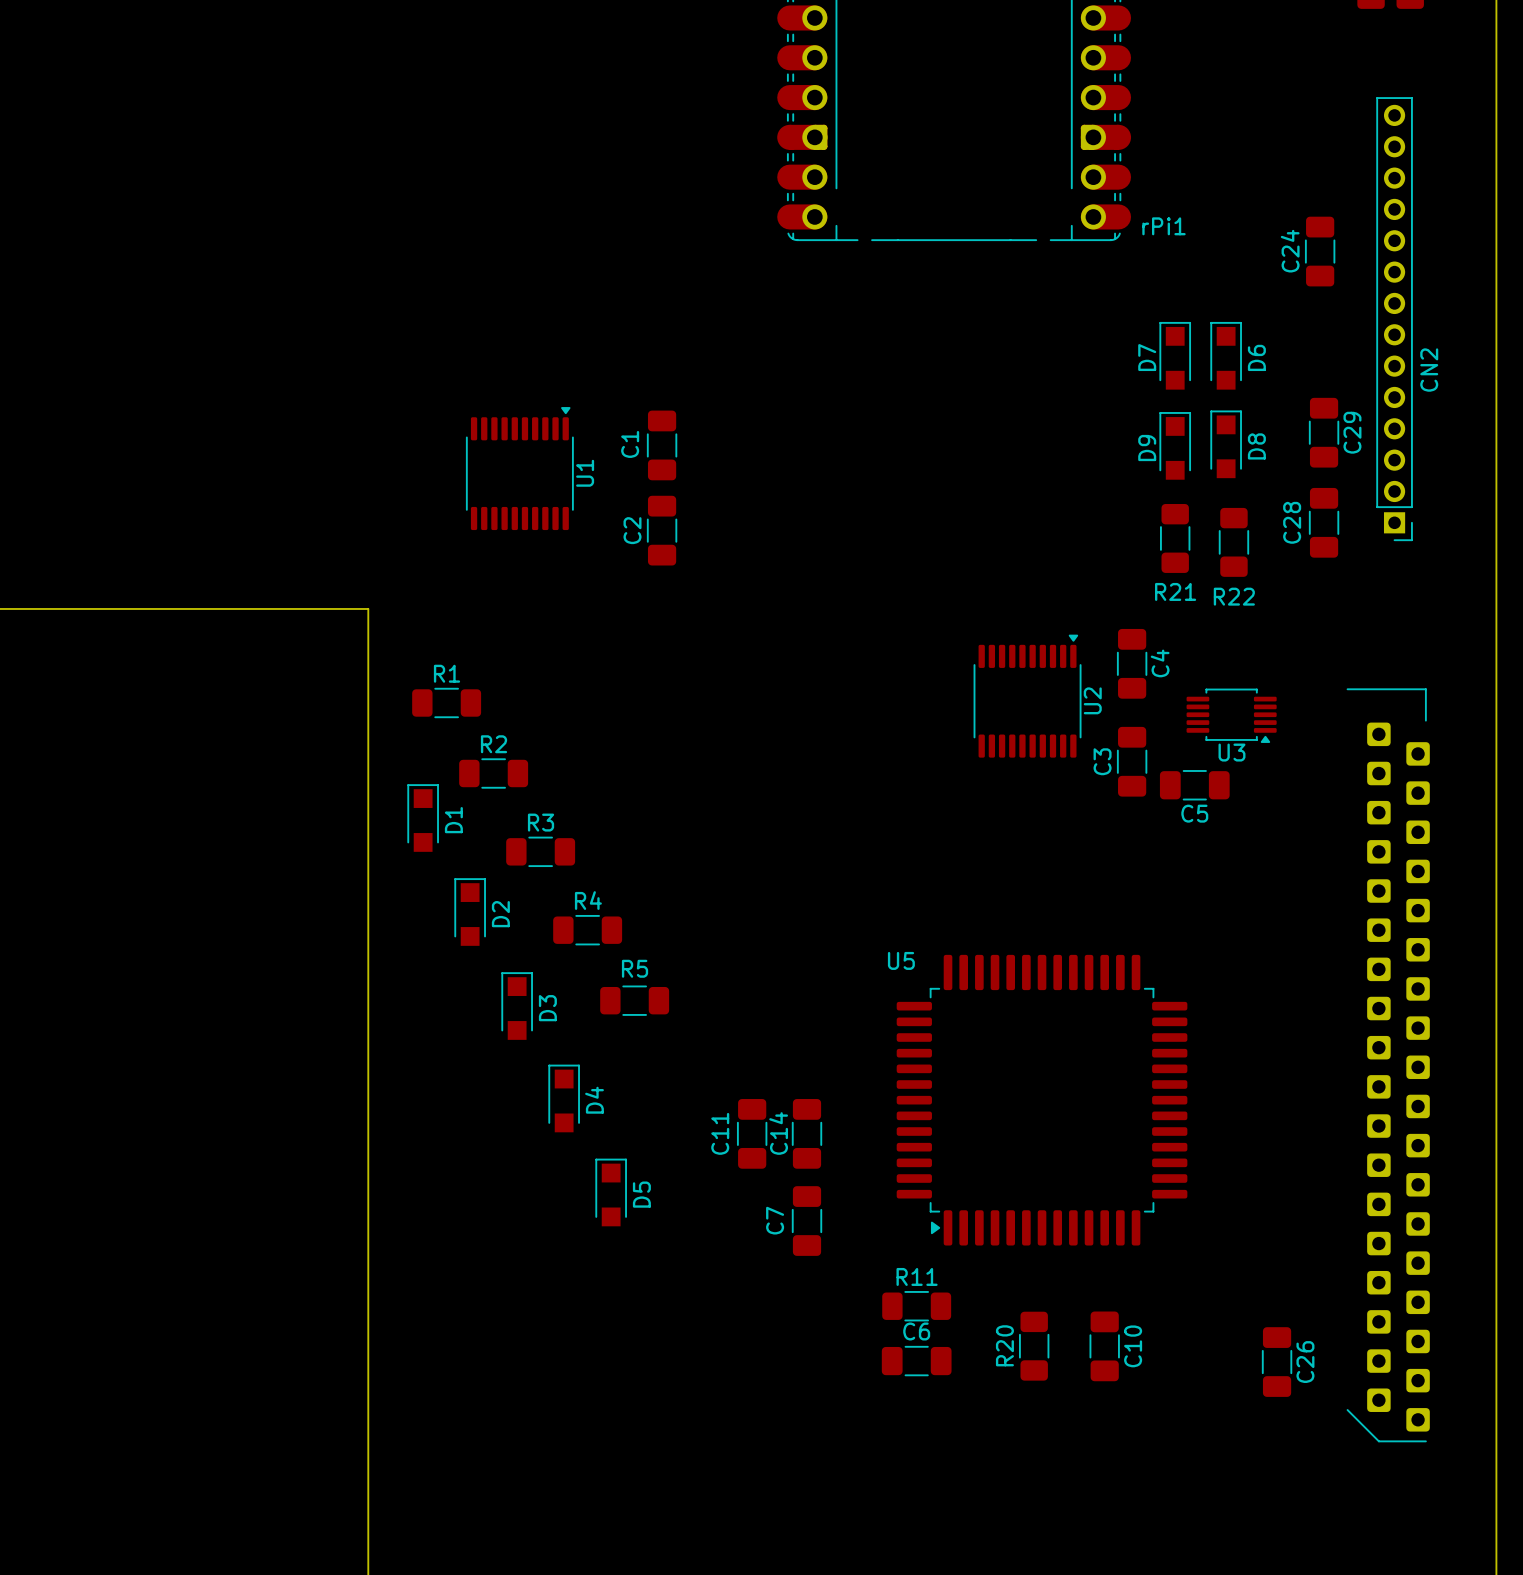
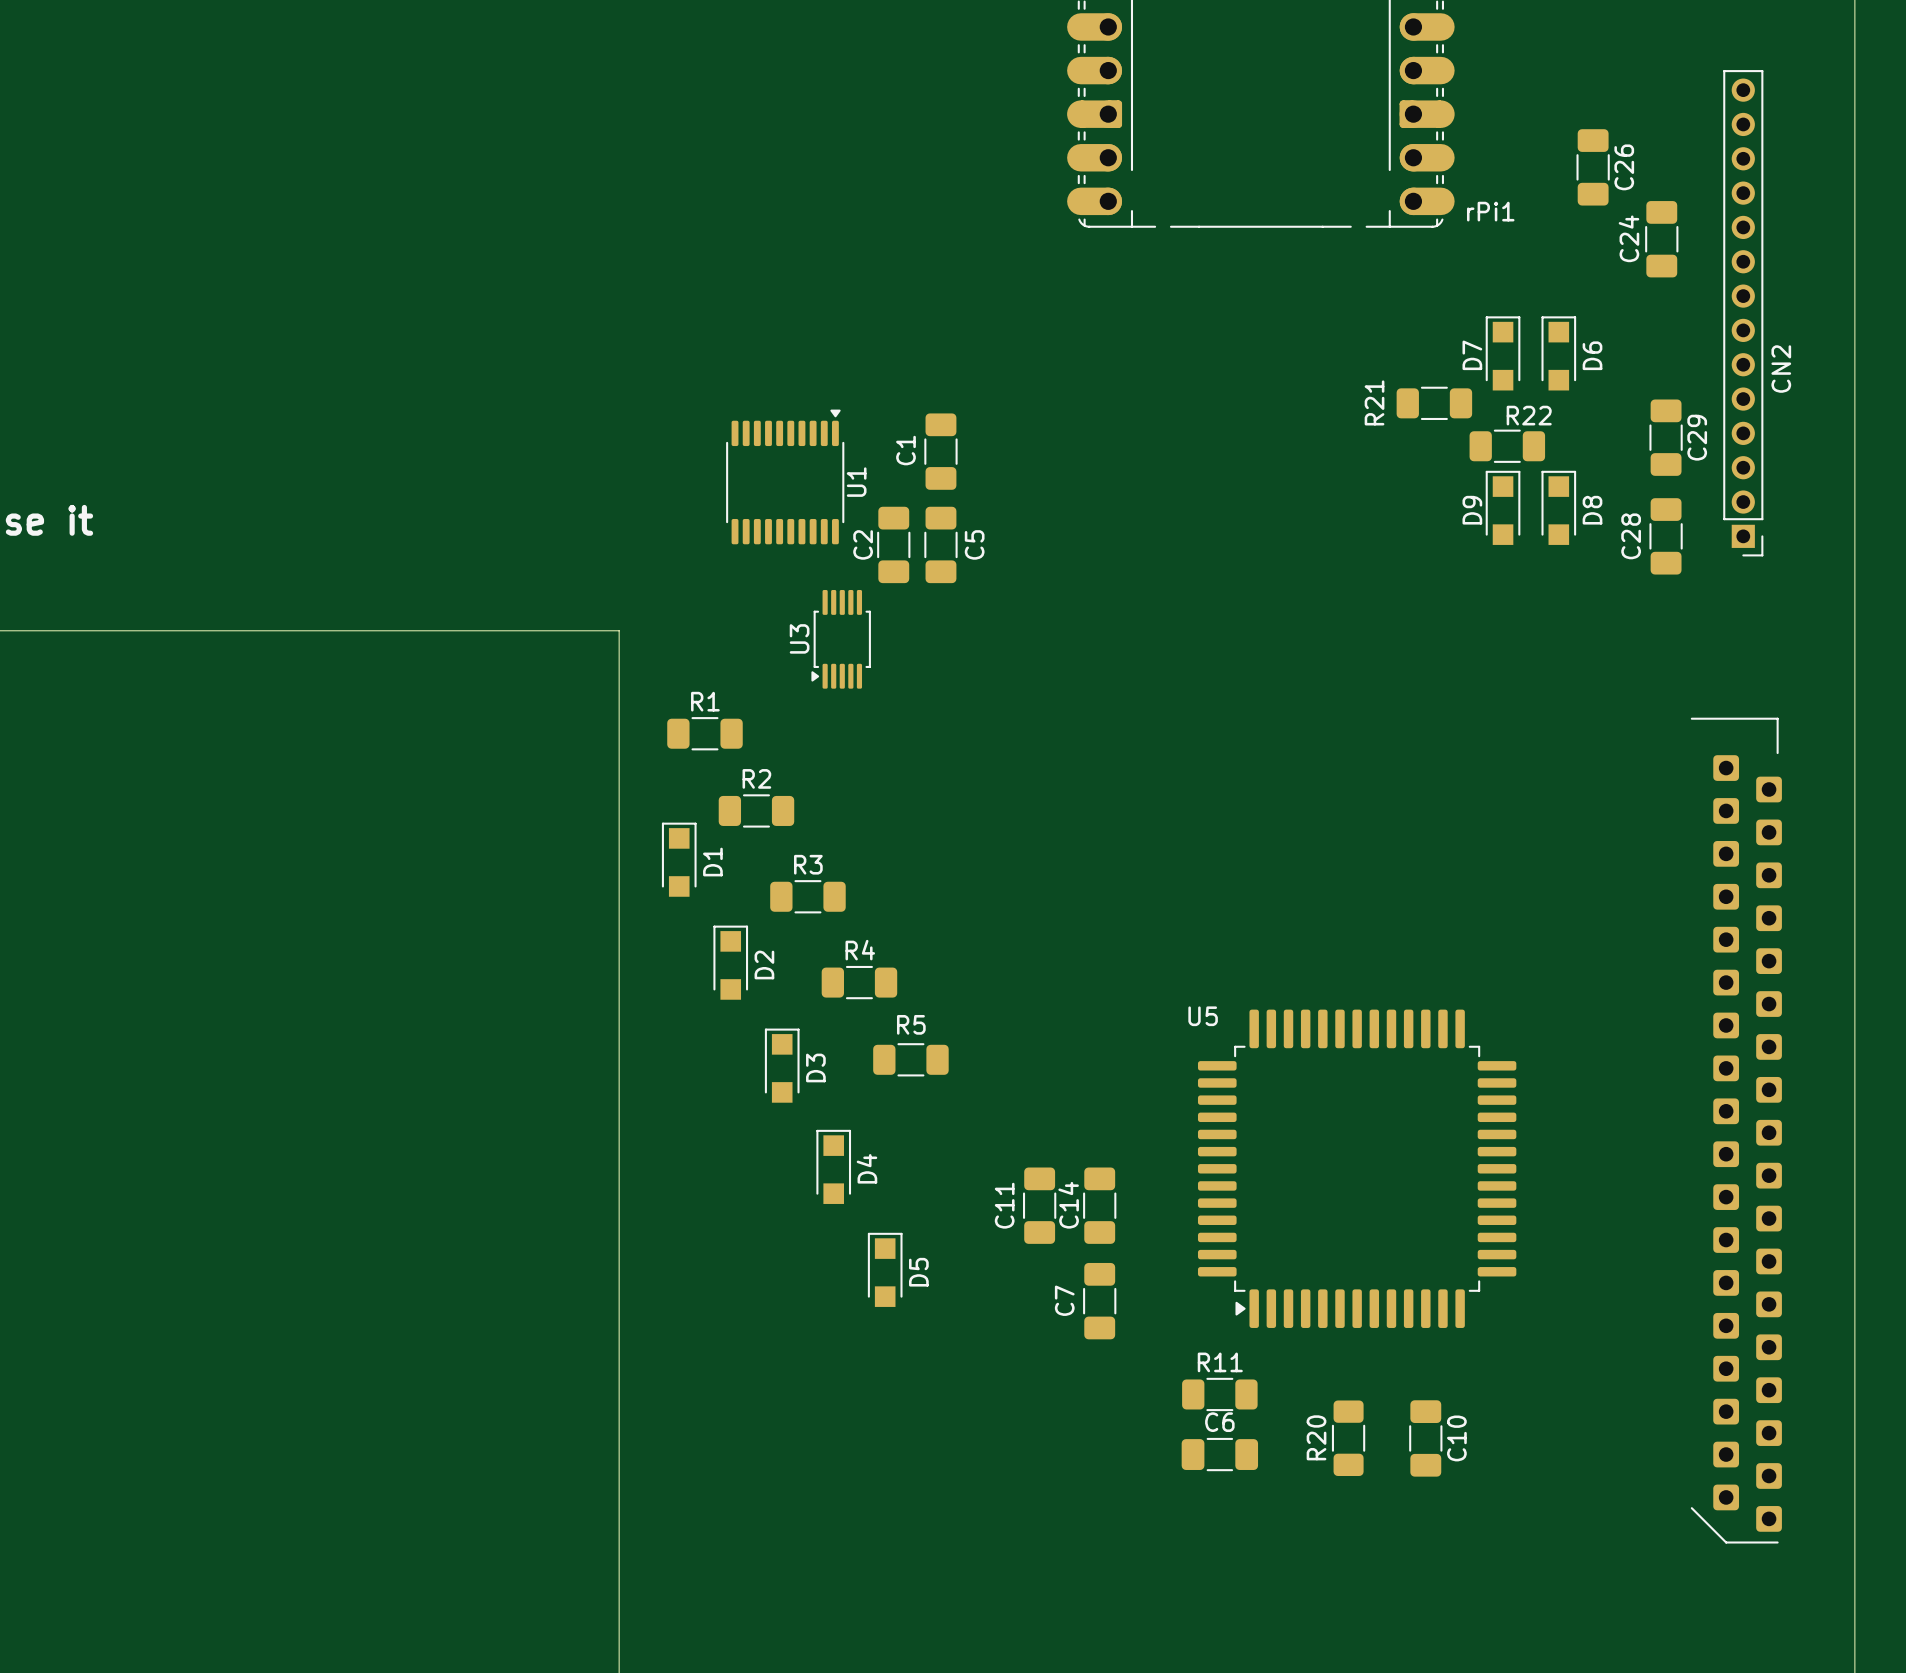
D8 position: (1226, 444) -> (1558, 507)
D9 position: (1175, 445) -> (1503, 507)
C2 name position: C2 (632, 530) -> C2 (863, 544)
R21 rotation: 0° (1175, 538) -> 90° clockwise (1434, 403)
R21 position: (1175, 538) -> (1434, 403)
R22 rotation: 0° (1233, 542) -> 90° clockwise (1507, 446)
R22 position: (1233, 542) -> (1507, 446)
R22 name position: R22 (1234, 596) -> R22 (1529, 415)
C4: (1132, 663) -> none
U2: (1027, 696) -> none
U3 rotation: 0° (1231, 715) -> 90° clockwise (841, 639)
U3 position: (1231, 715) -> (841, 639)
C3: (1132, 761) -> none
C5 rotation: 0° (1194, 785) -> 90° clockwise (893, 544)
C5 position: (1194, 785) -> (893, 544)
C5 name position: C5 (1194, 813) -> C5 (974, 544)
C26 position: (1277, 1362) -> (1593, 167)

